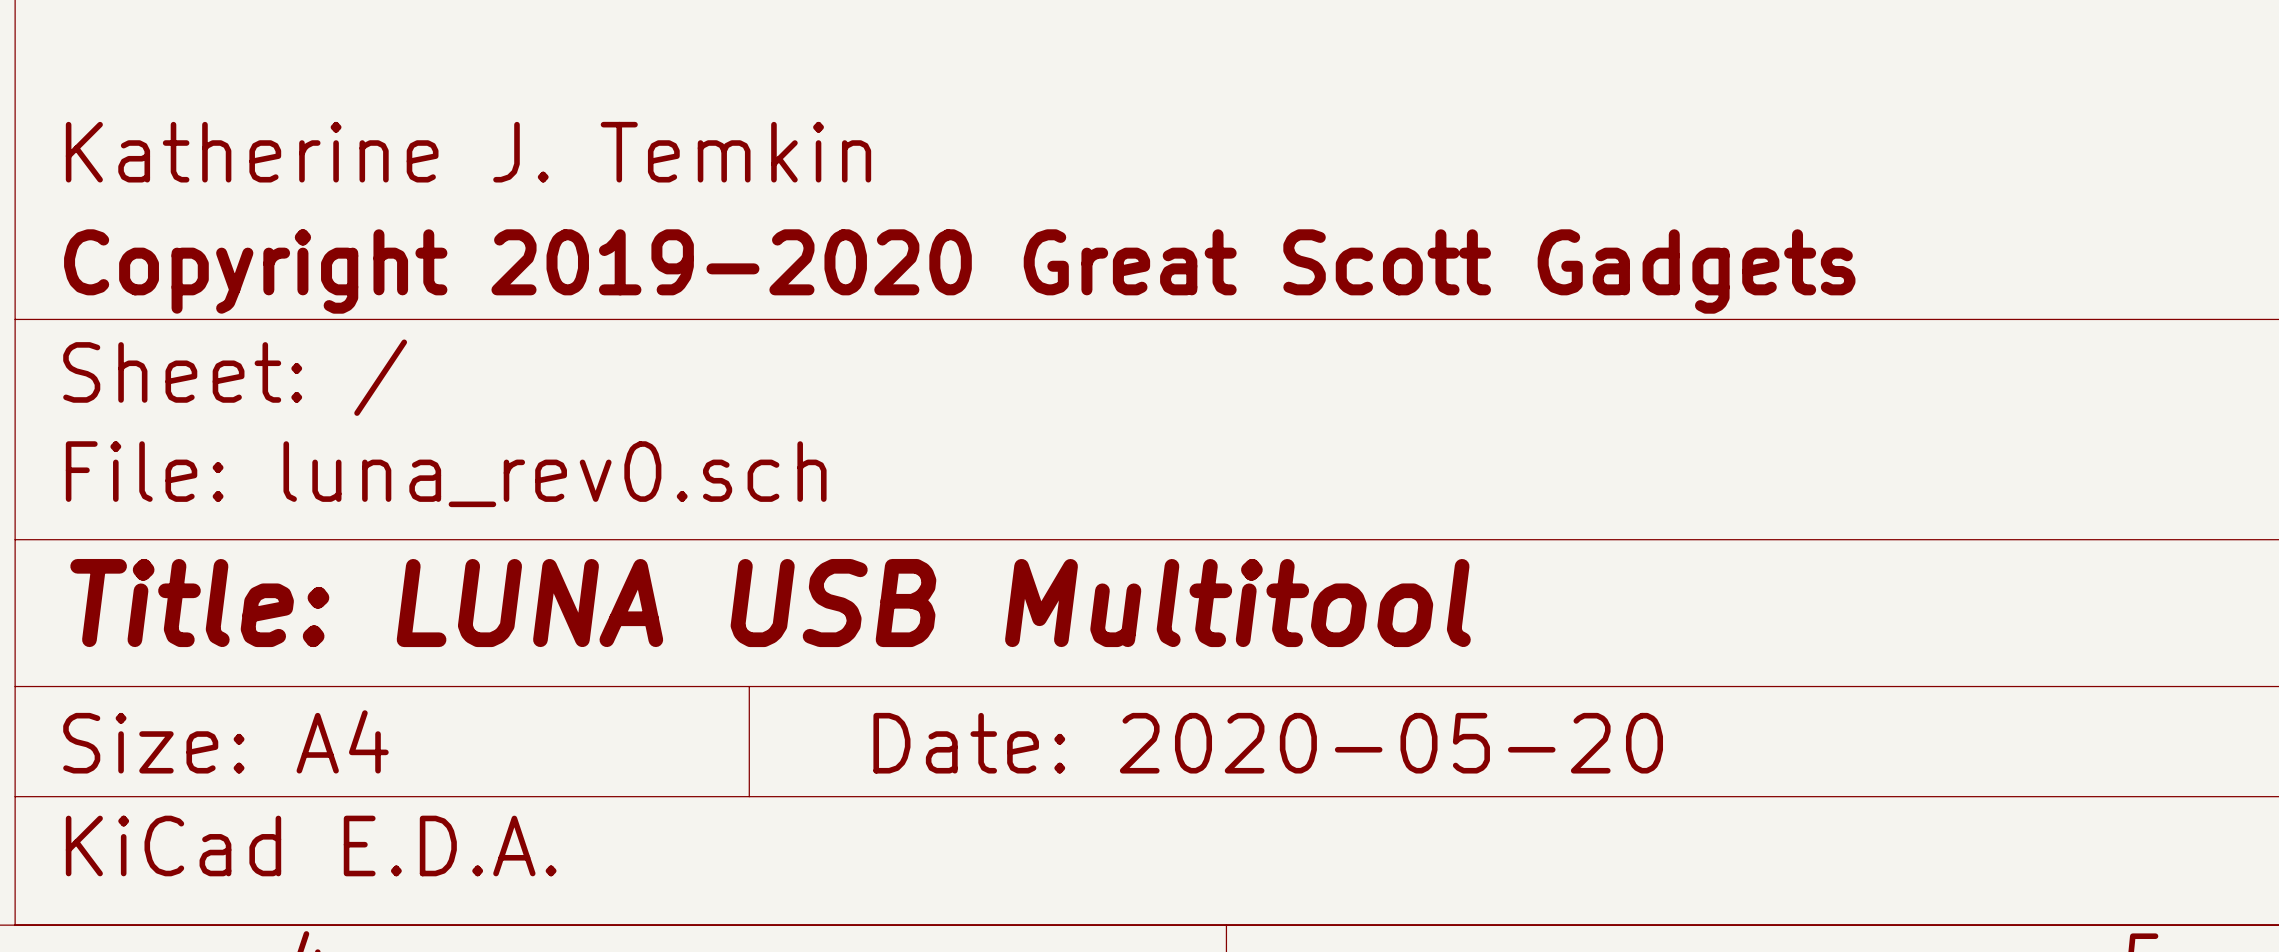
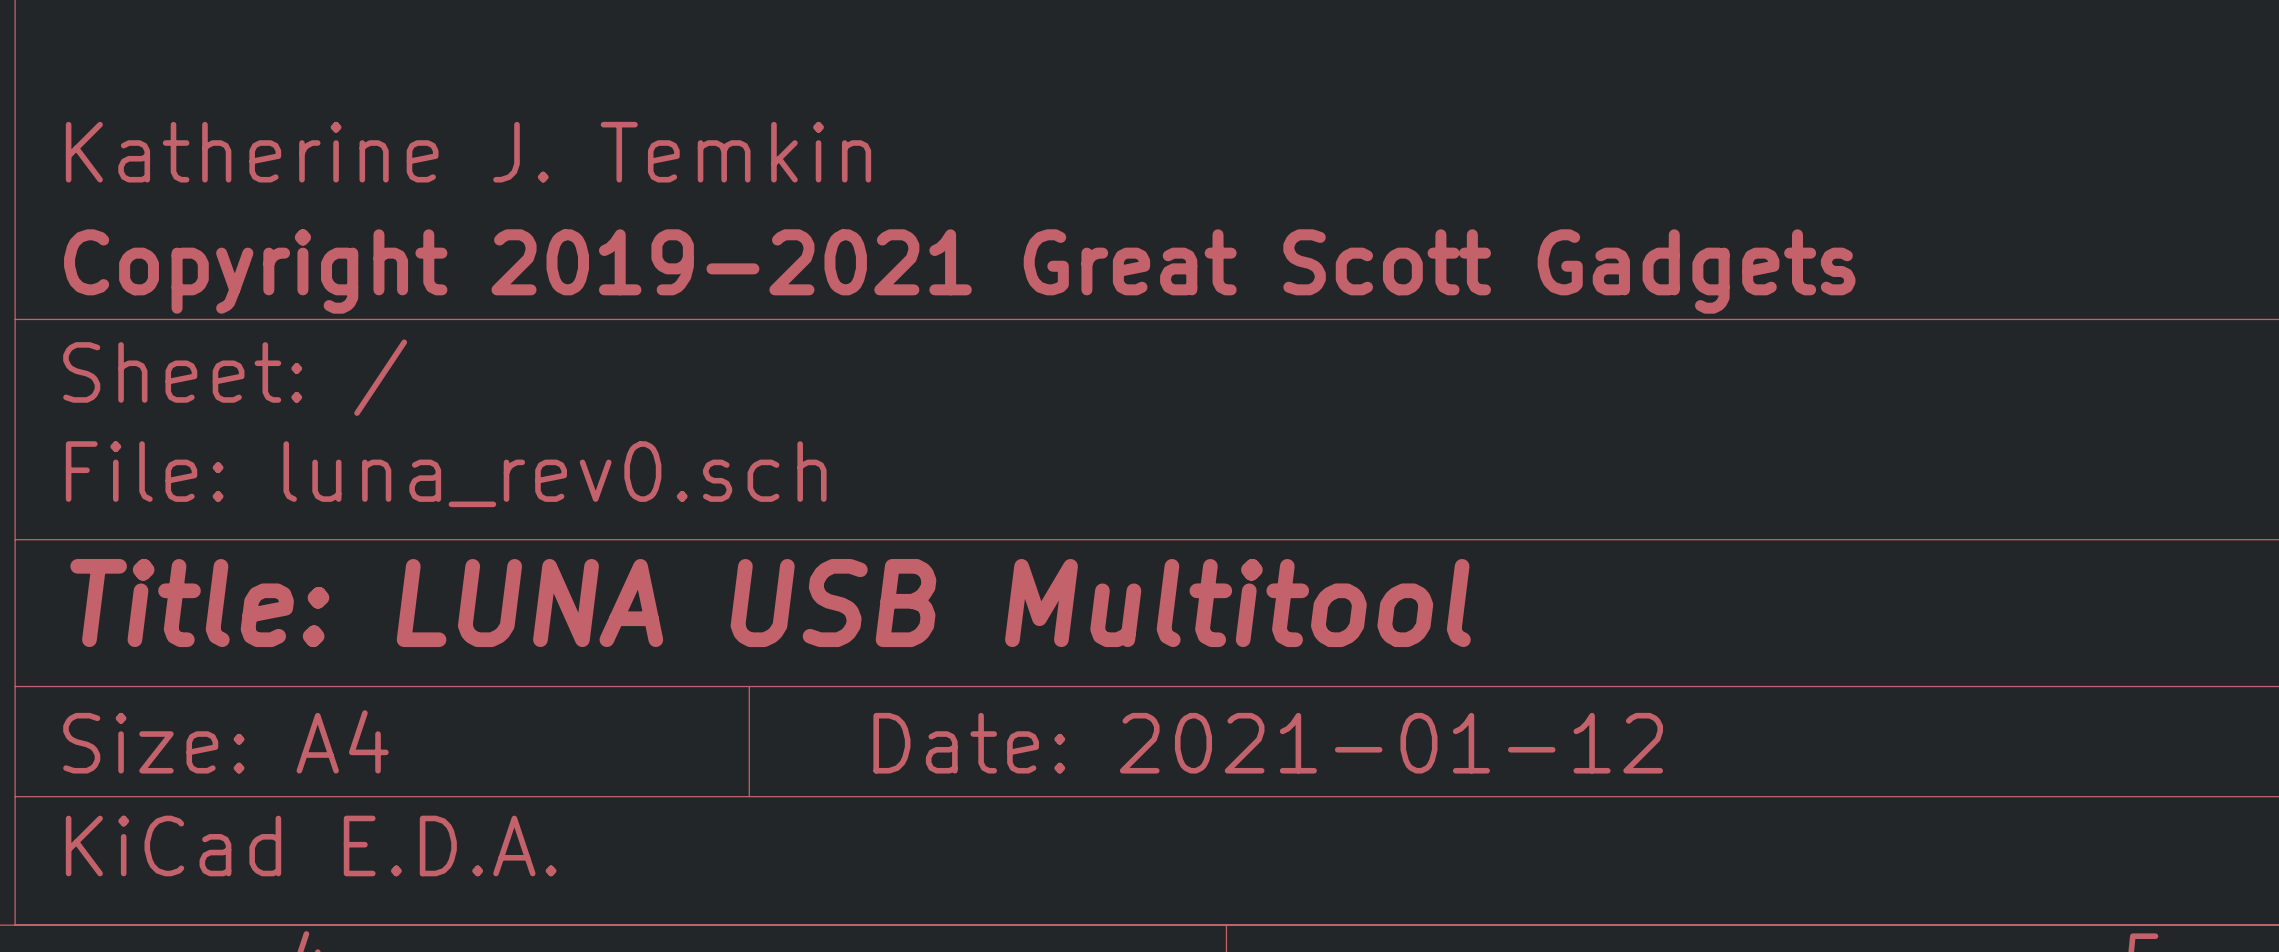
title block: Copyright 2019-2020 Great Scott Gadgets (959, 271) -> Copyright 2019-2021 Great Scott Gadgets (959, 271)
title block: Date: 2020-05-20 (1268, 743) -> Date: 2021-01-12 (1268, 743)

